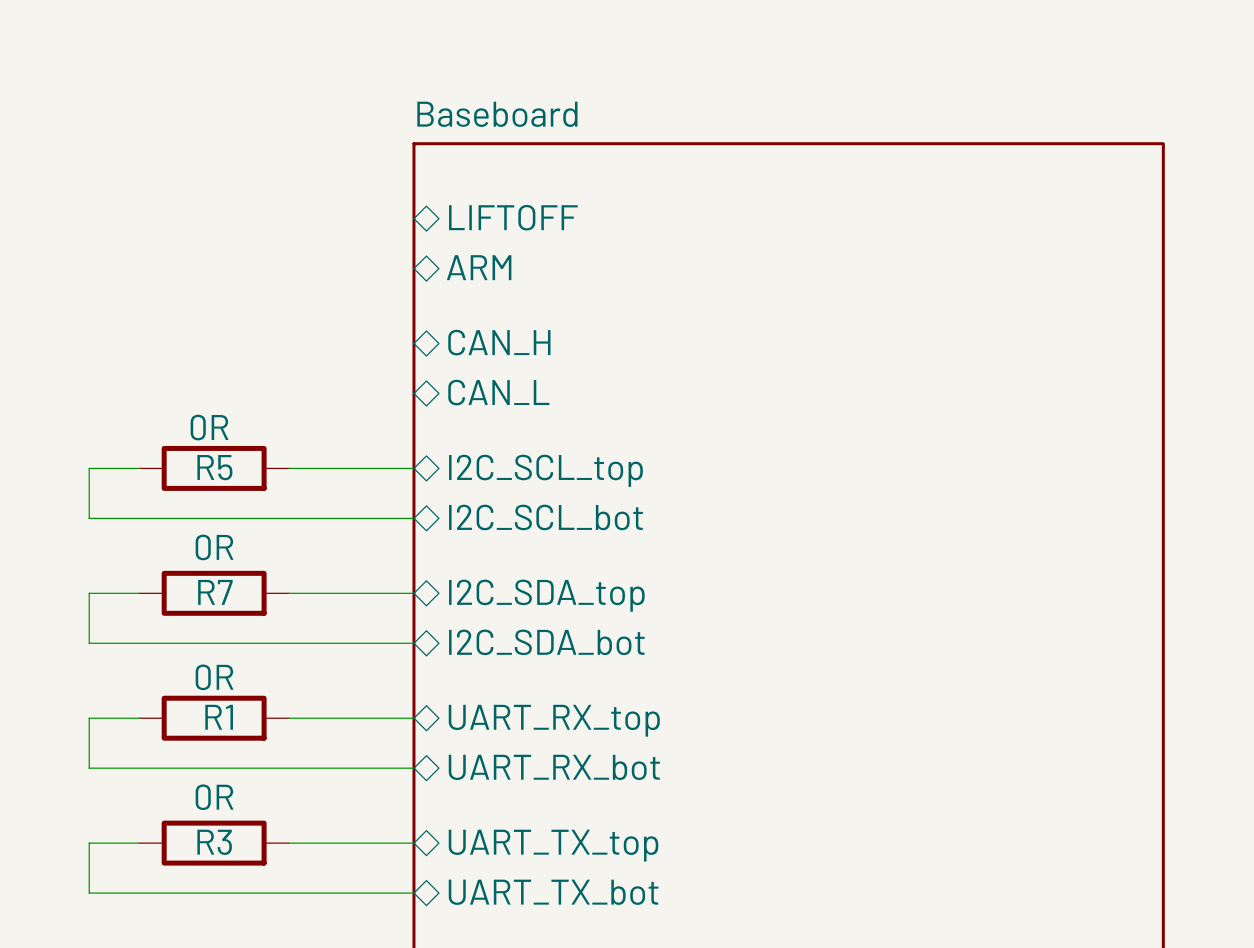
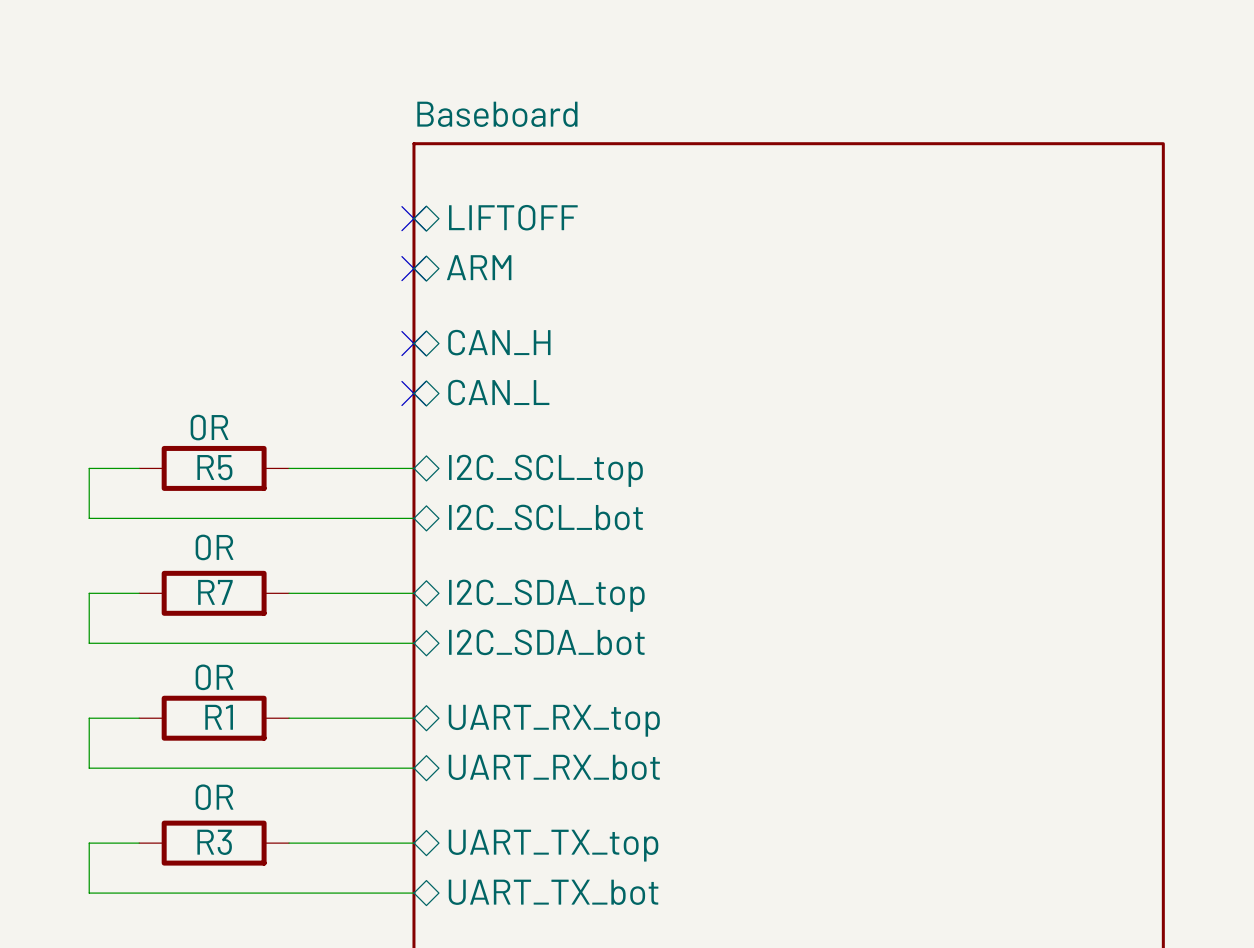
no-connect mark: none -> (413, 218)
no-connect mark: none -> (413, 268)
no-connect mark: none -> (413, 343)
no-connect mark: none -> (413, 393)

